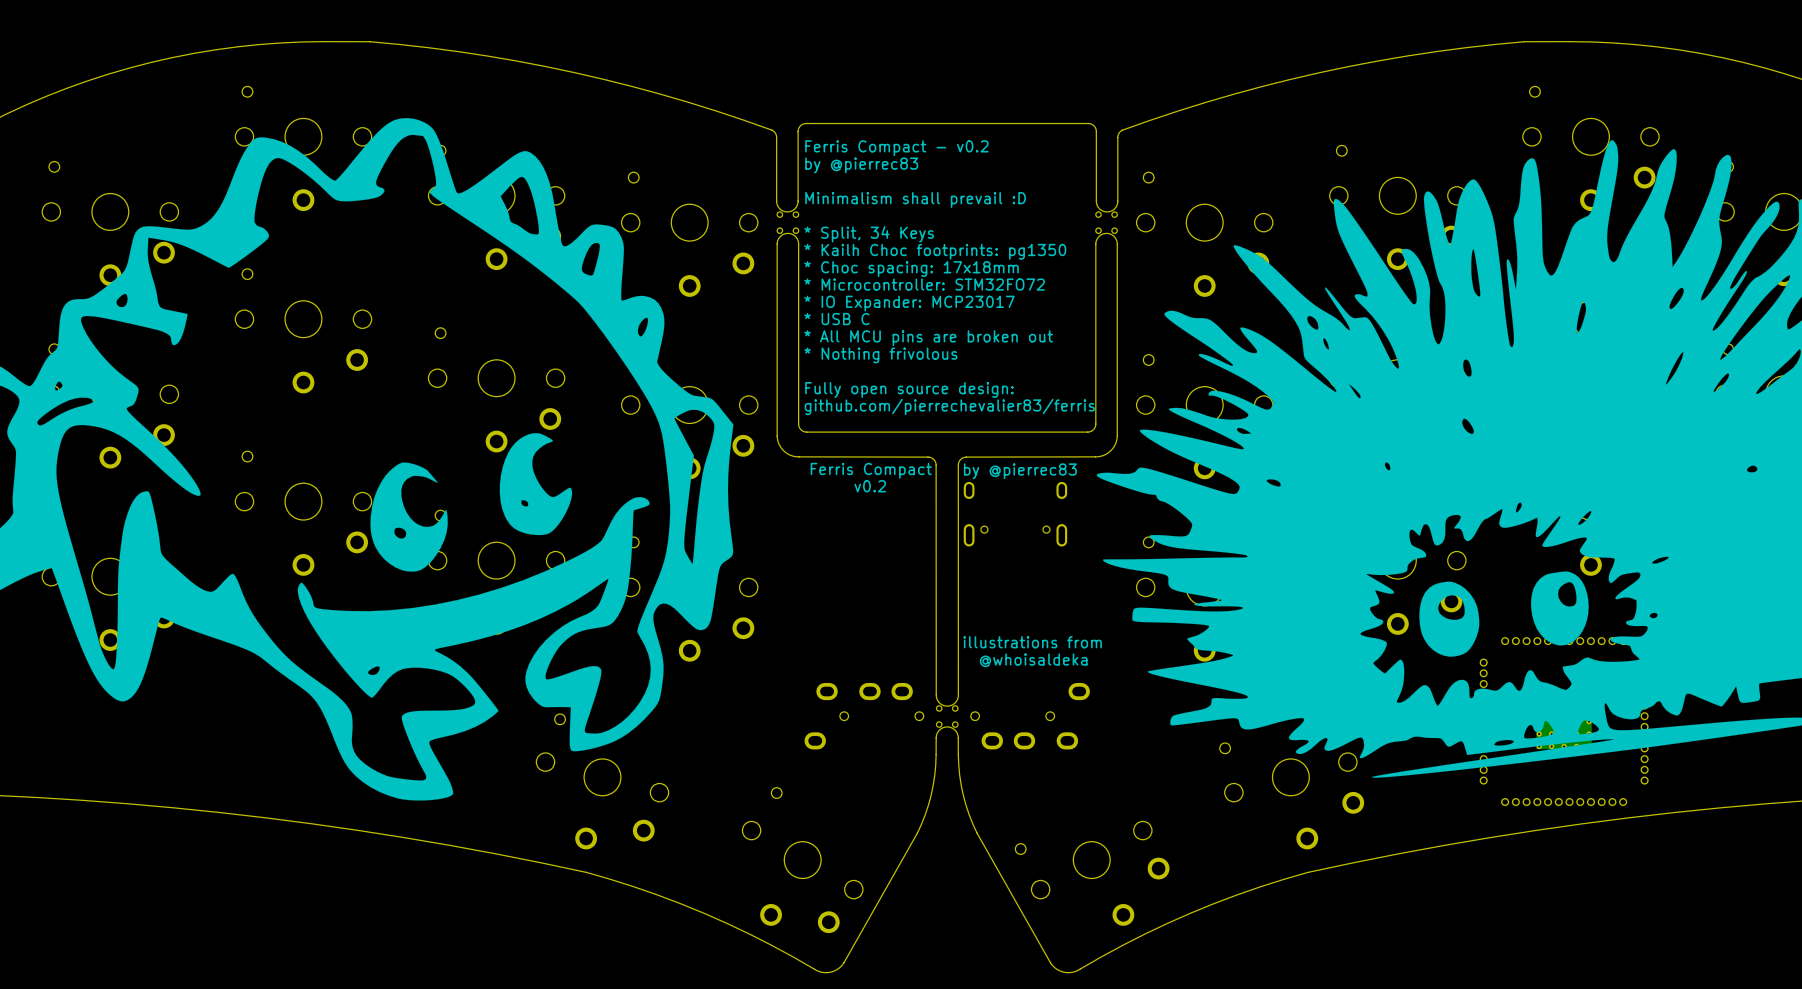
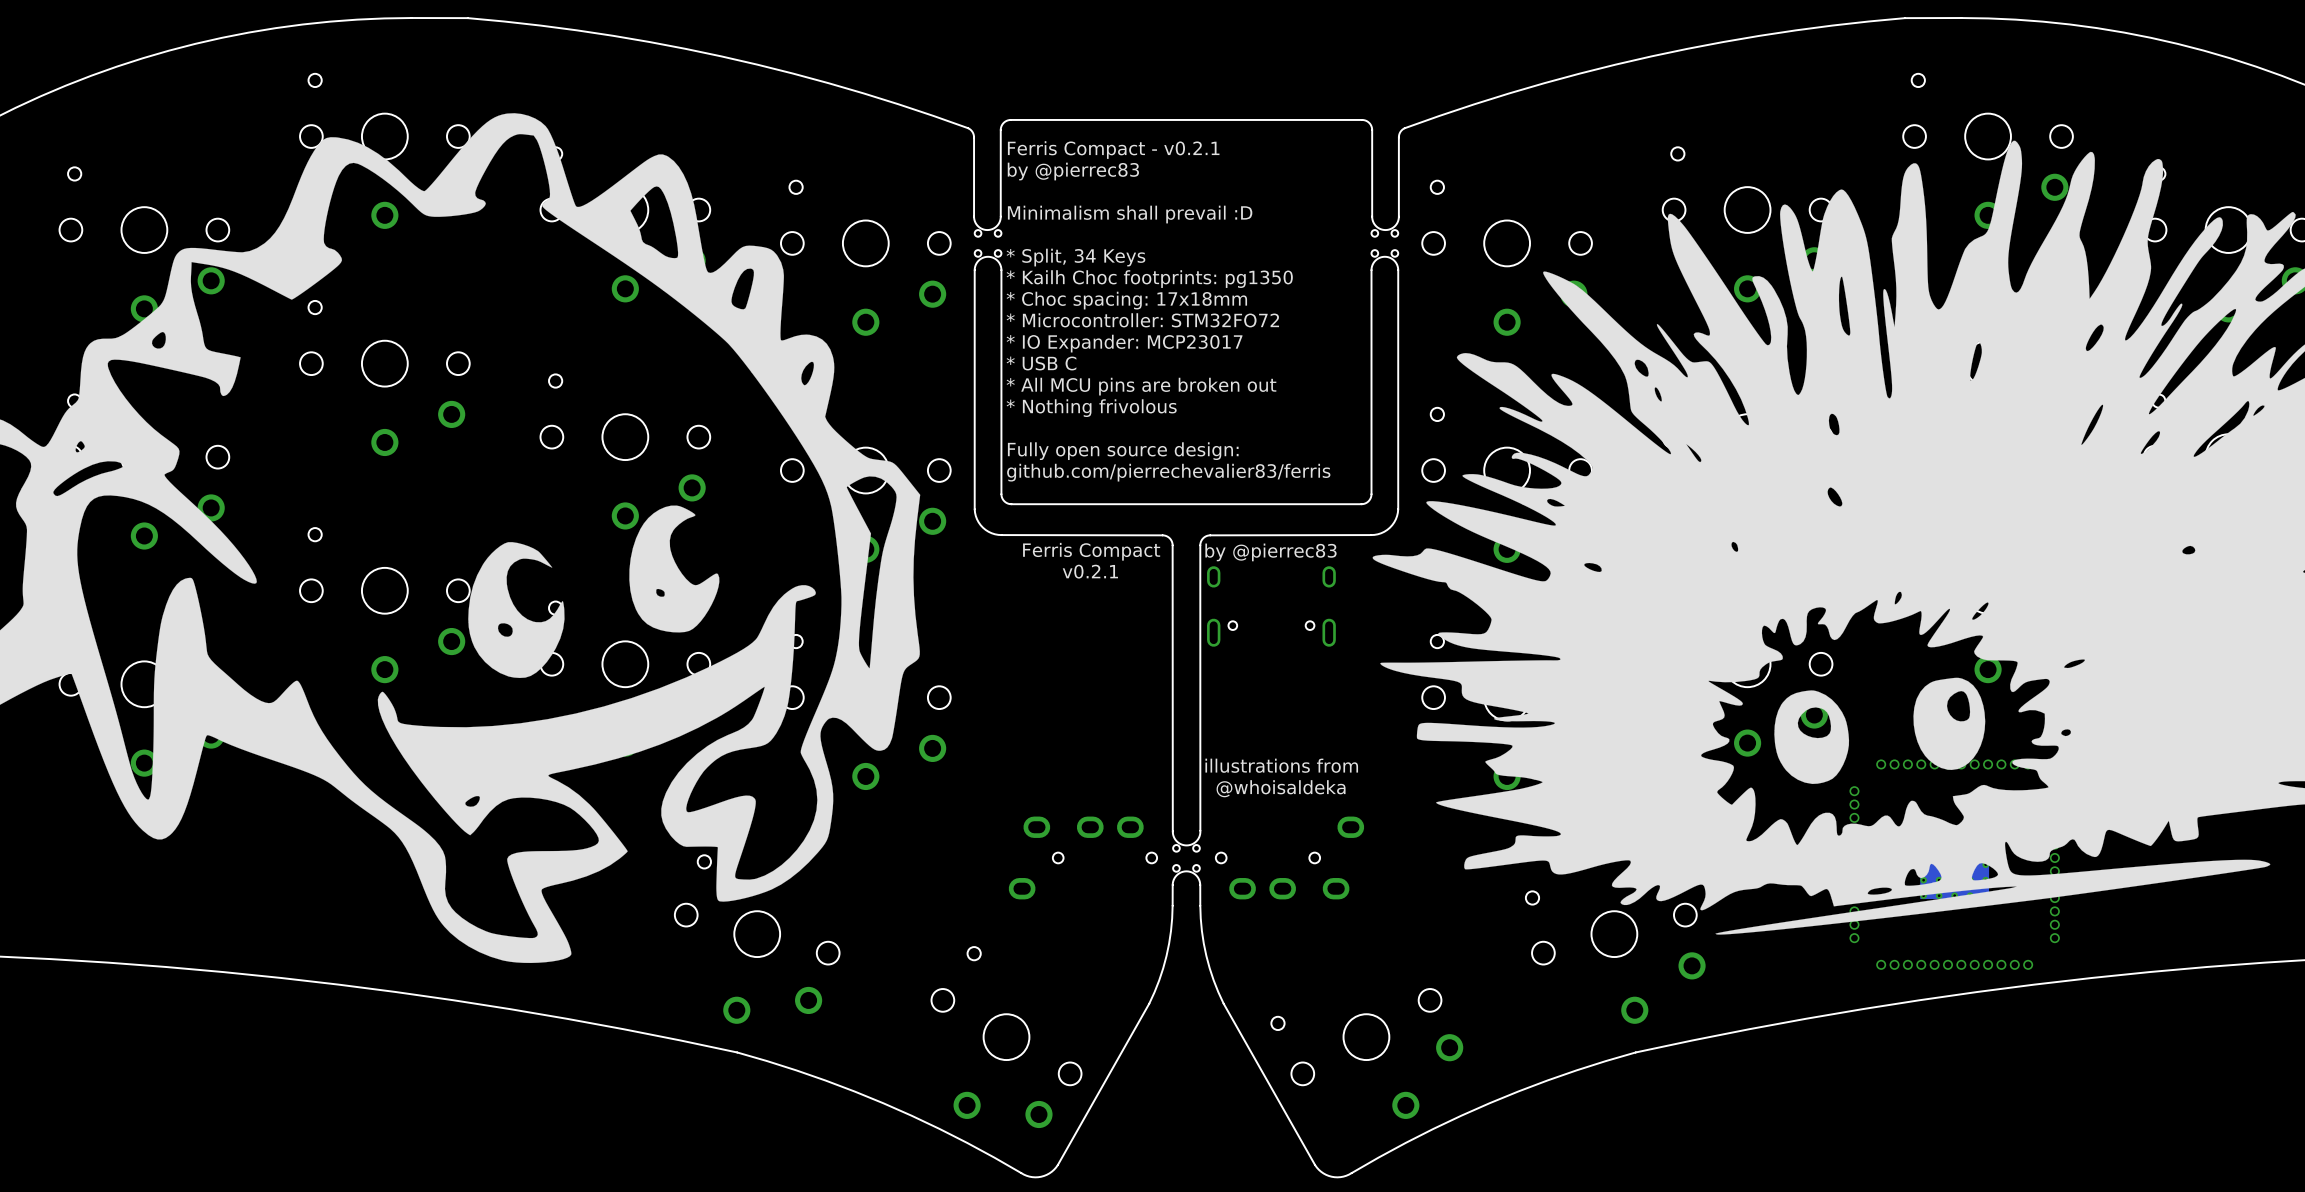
text: Ferris Compact - v0.2 (896, 148) -> Ferris Compact - v0.2.1 (1113, 150)
text: v0.2 (870, 486) -> v0.2.1 (1090, 571)

